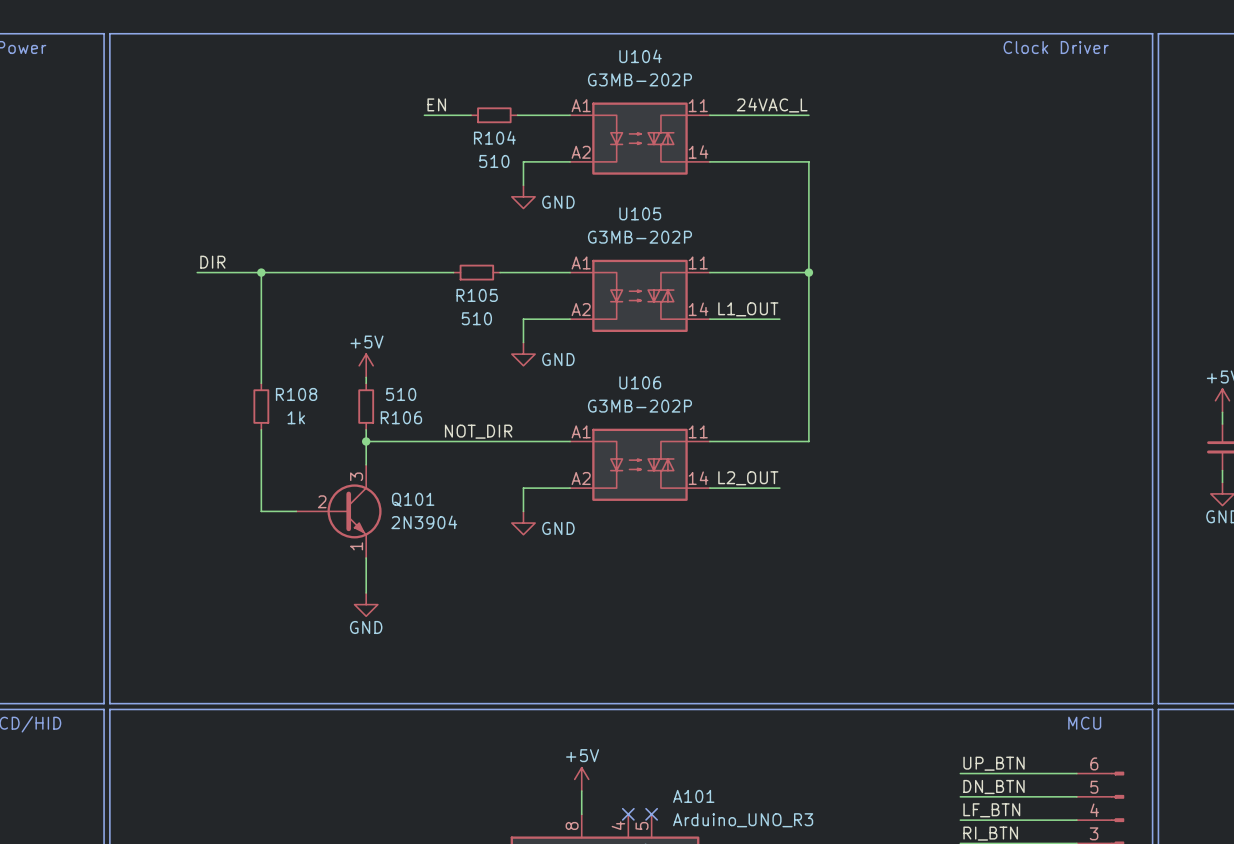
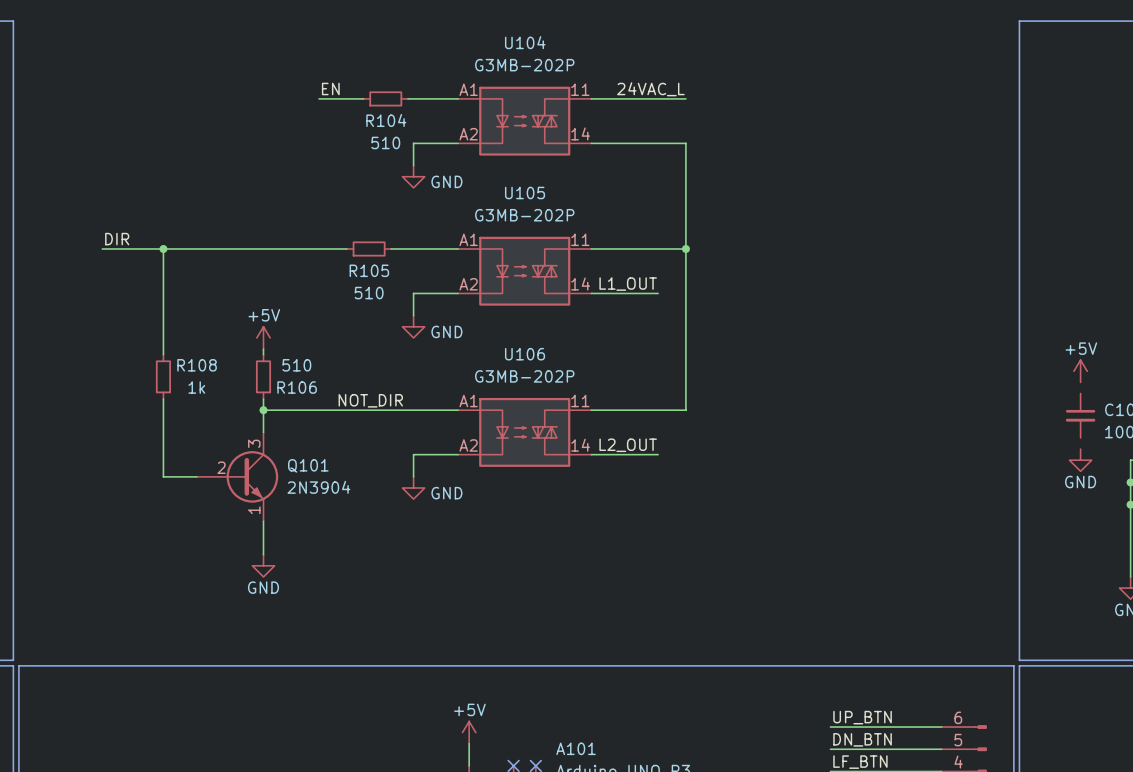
line: (109, 33) (109, 703) (1152, 703) (1152, 33) (109, 33) -> none
text: Clock Driver (1056, 47) -> none
wire: (1222, 412) (1222, 424) -> none
wire: (1222, 470) (1222, 482) -> none
text: MCU (1084, 723) -> none

